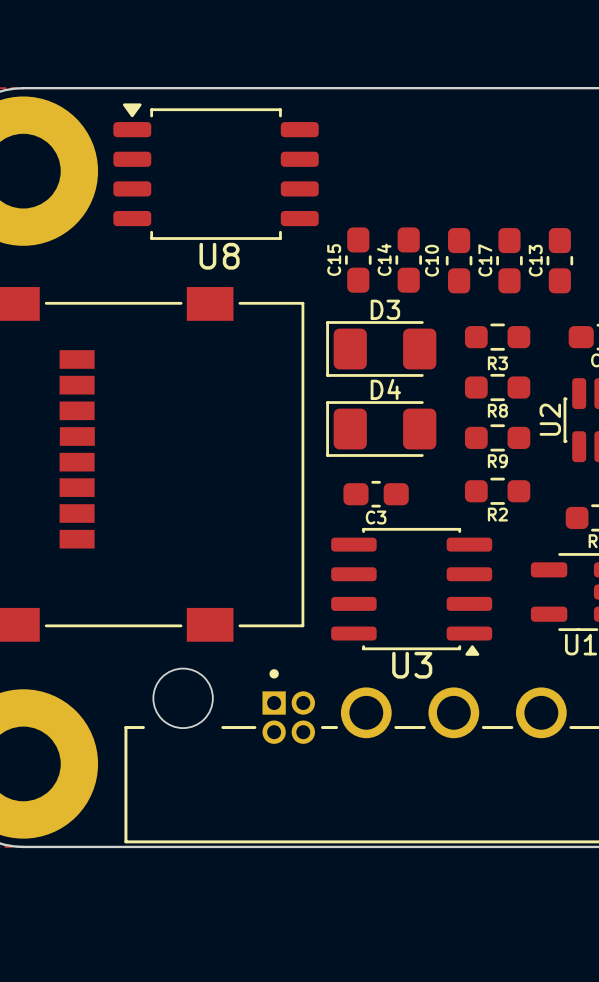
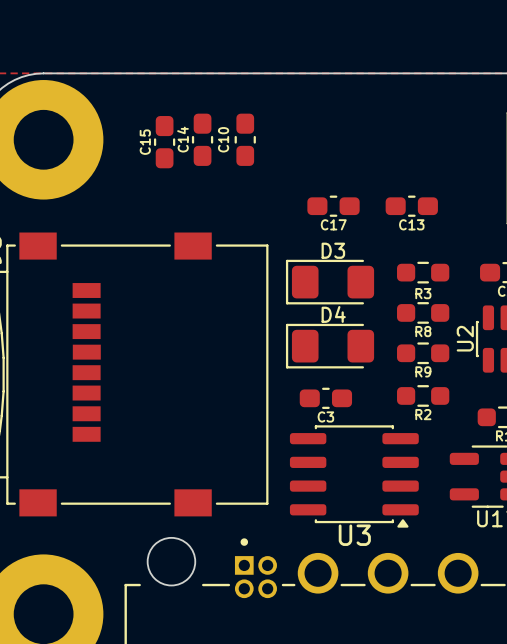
U8: (216, 171) -> none
C15 position: (358, 260) -> (164, 142)
C14 position: (408, 260) -> (202, 139)
C10 position: (459, 260) -> (245, 139)
C17 rotation: 0° (509, 260) -> 90° clockwise (333, 206)
C17 position: (509, 260) -> (333, 206)
C13 rotation: 0° (559, 260) -> 90° clockwise (411, 206)
C13 position: (559, 260) -> (411, 206)

